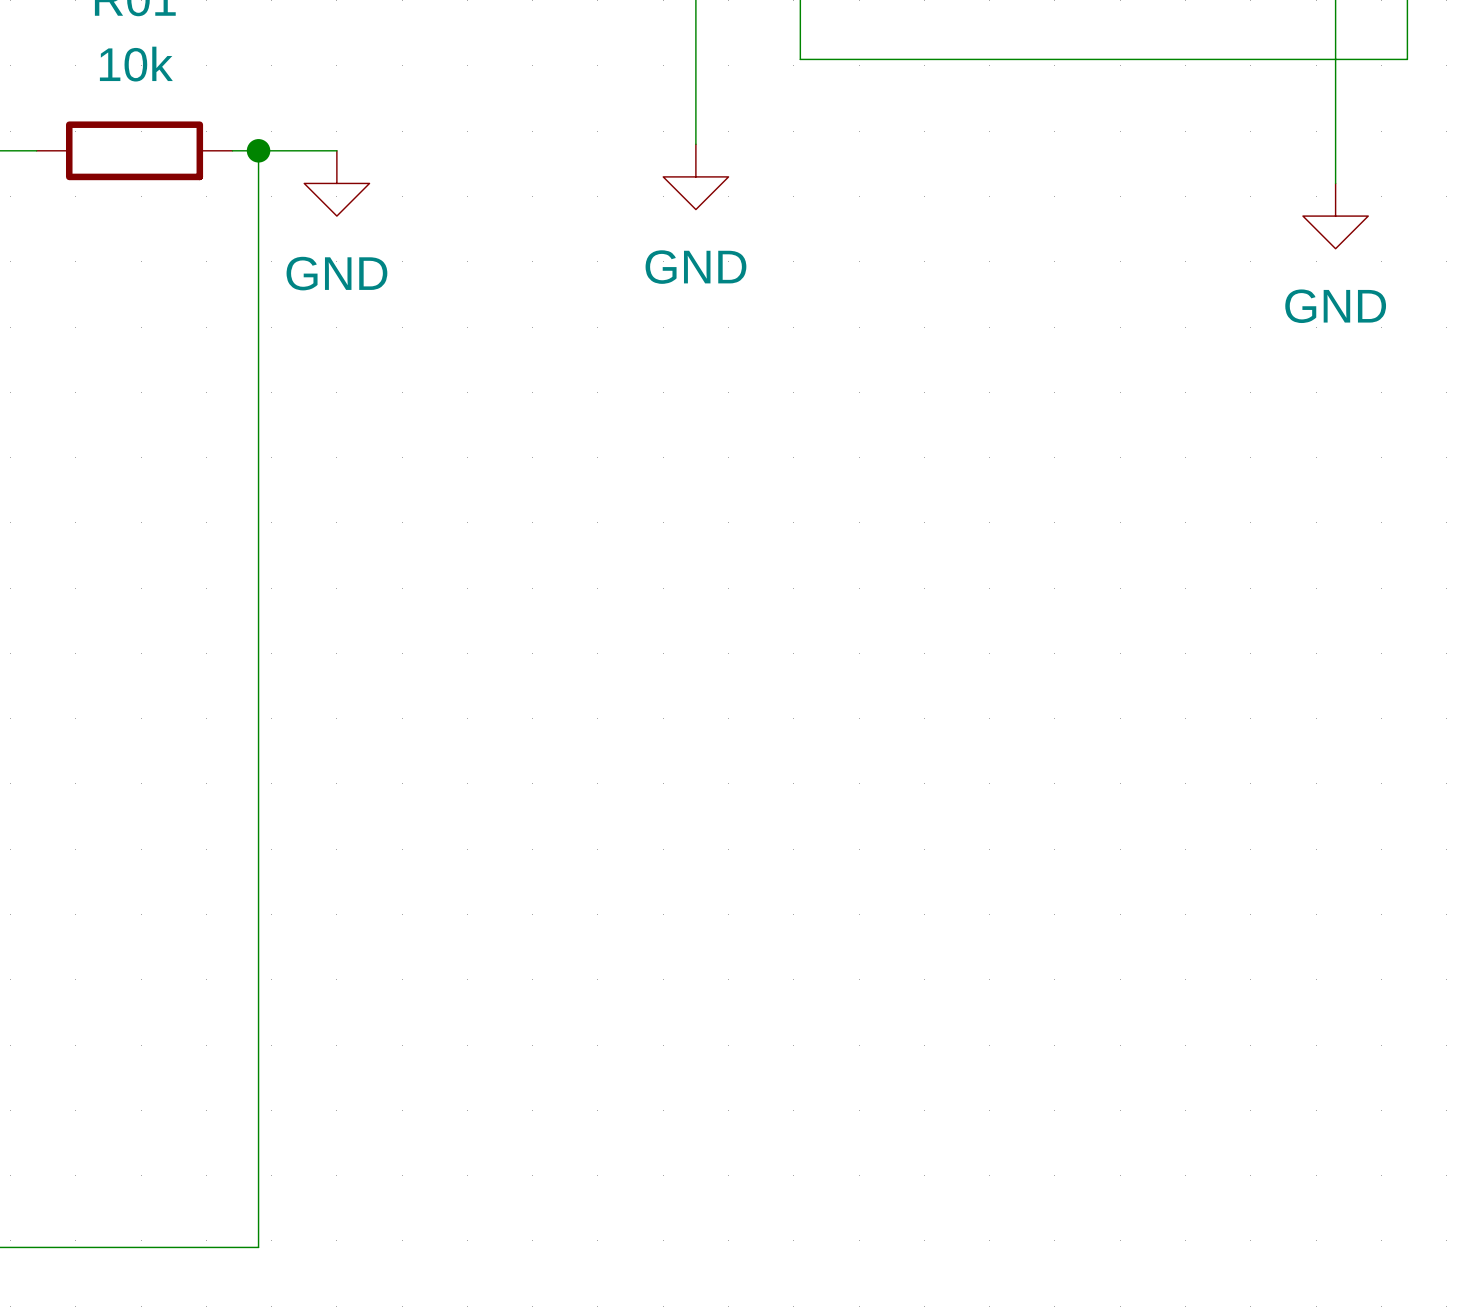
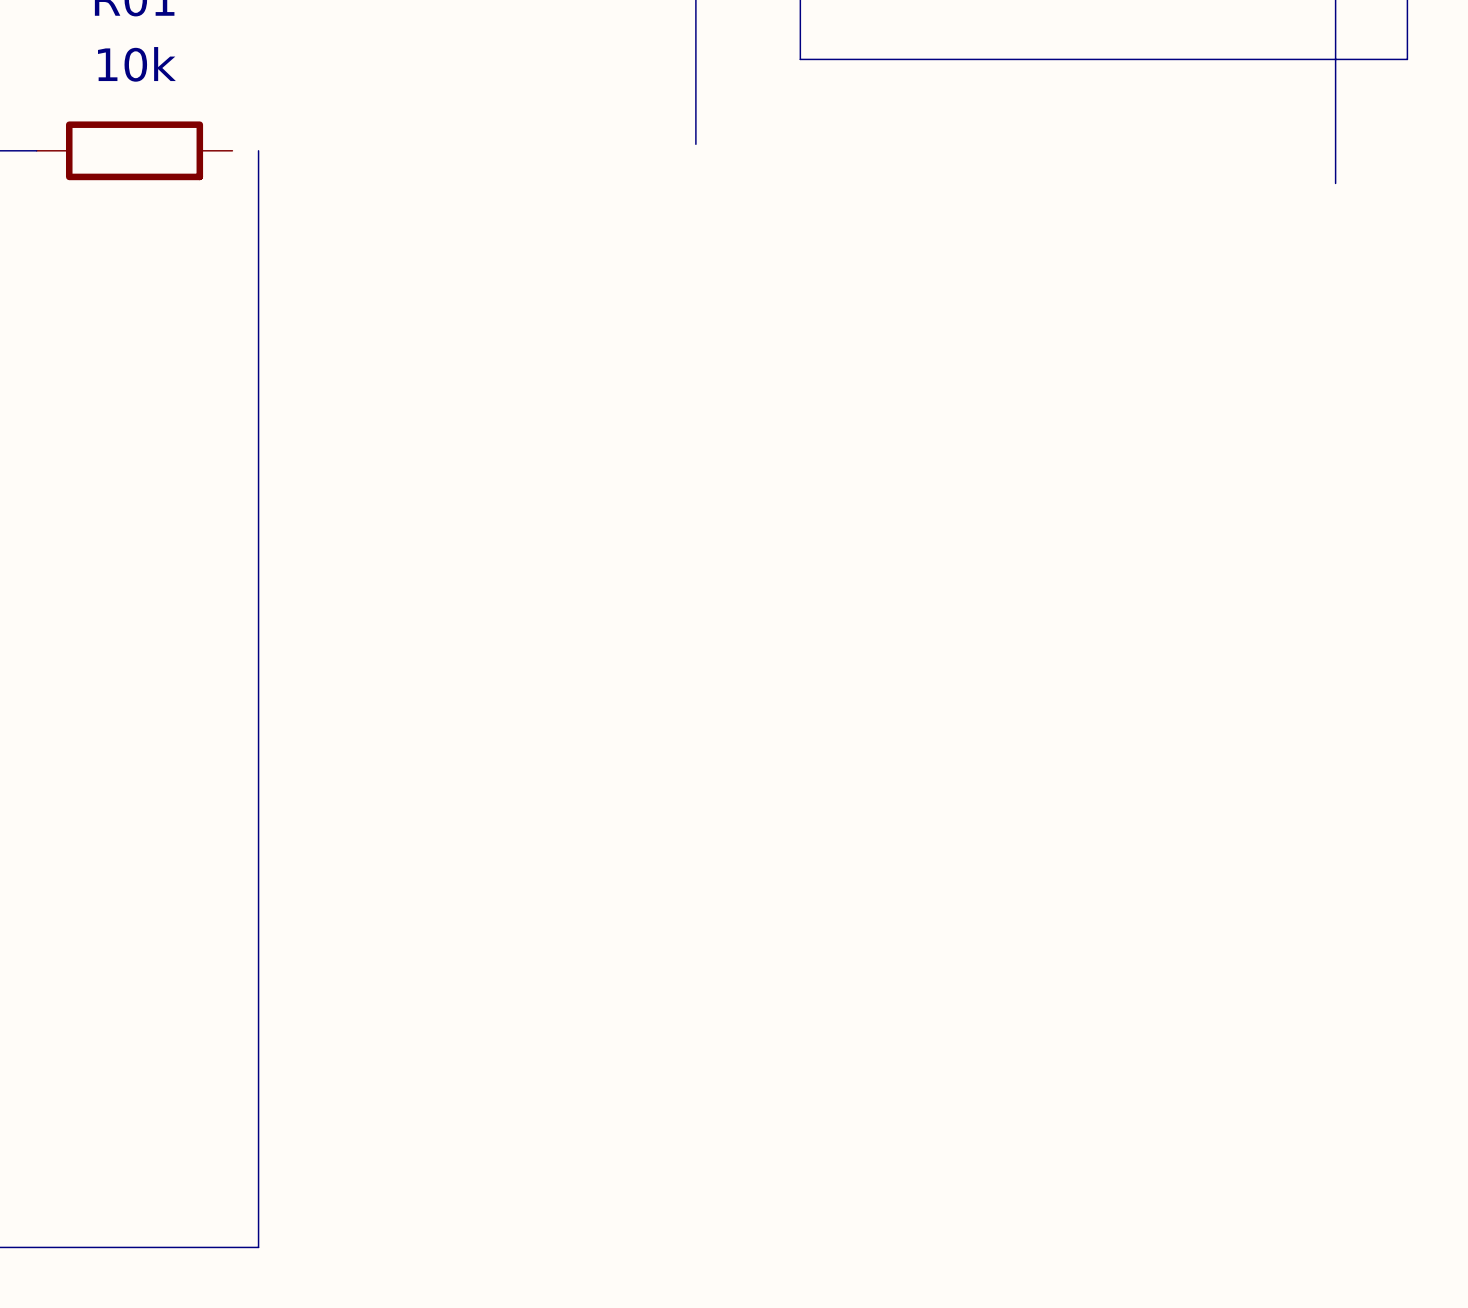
wire: (232, 150) (336, 150) -> none
junction: (258, 150) -> none
power symbol: GND (695, 176) -> none
power symbol: GND (336, 183) -> none
power symbol: GND (1335, 216) -> none

